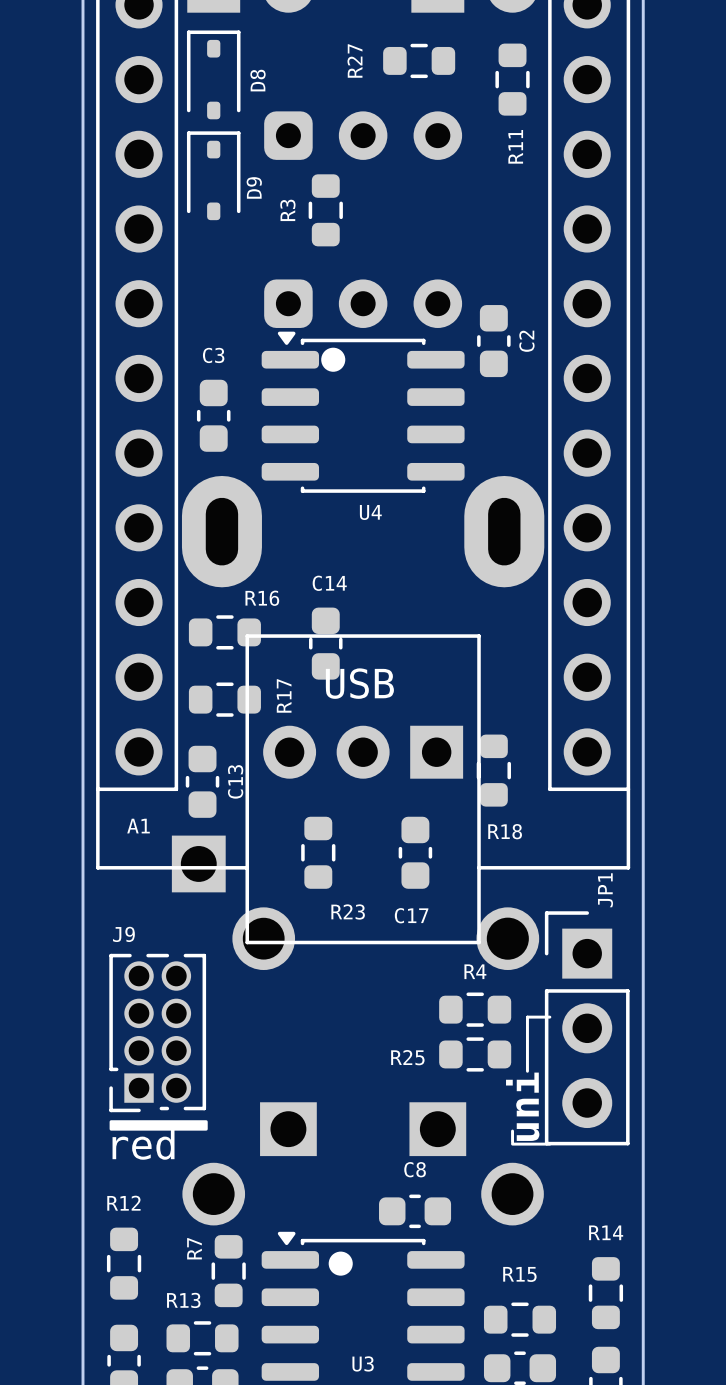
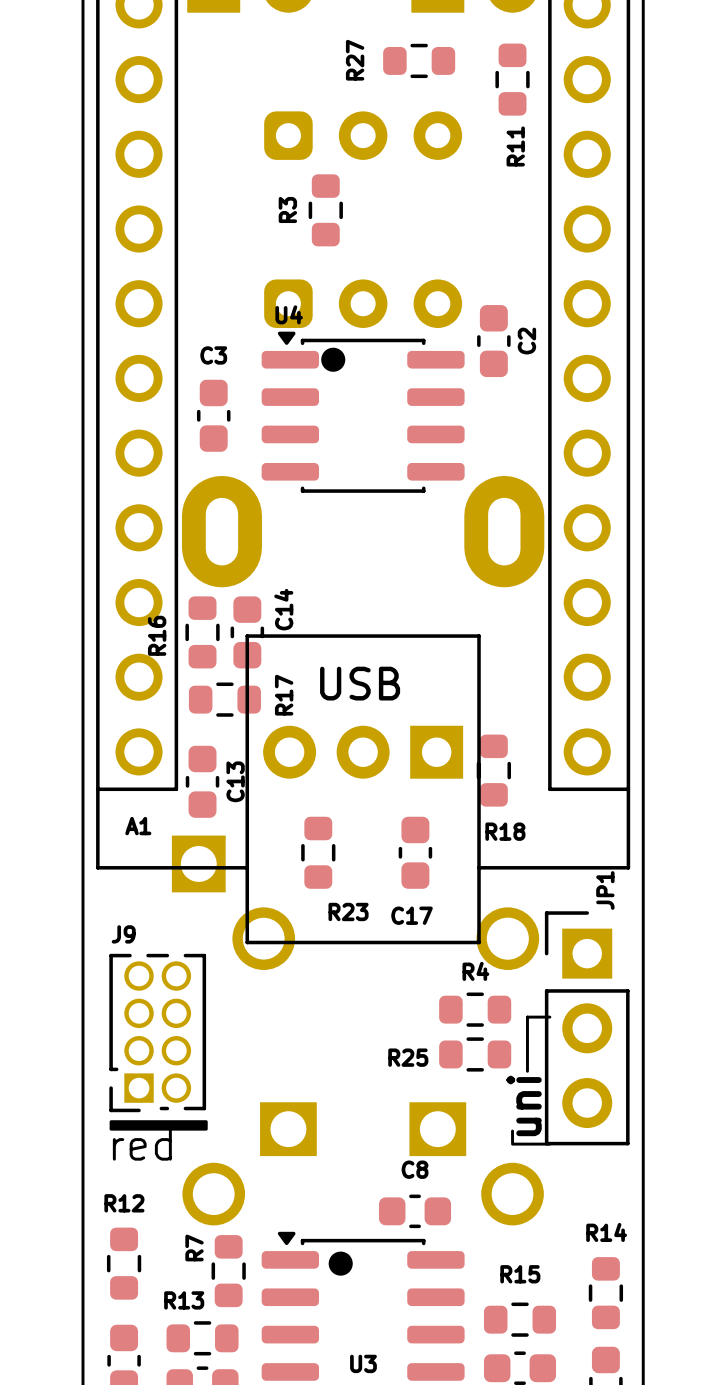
D8: (213, 74) -> none
D9: (213, 175) -> none
U4 name position: U4 (370, 512) -> U4 (289, 314)
C14 name rotation: 0° (329, 583) -> 90° counterclockwise (283, 609)
R16 name position: R16 (262, 598) -> R16 (157, 635)
R16 rotation: 0° (224, 632) -> 90° clockwise (202, 632)
C14 position: (325, 643) -> (247, 632)

